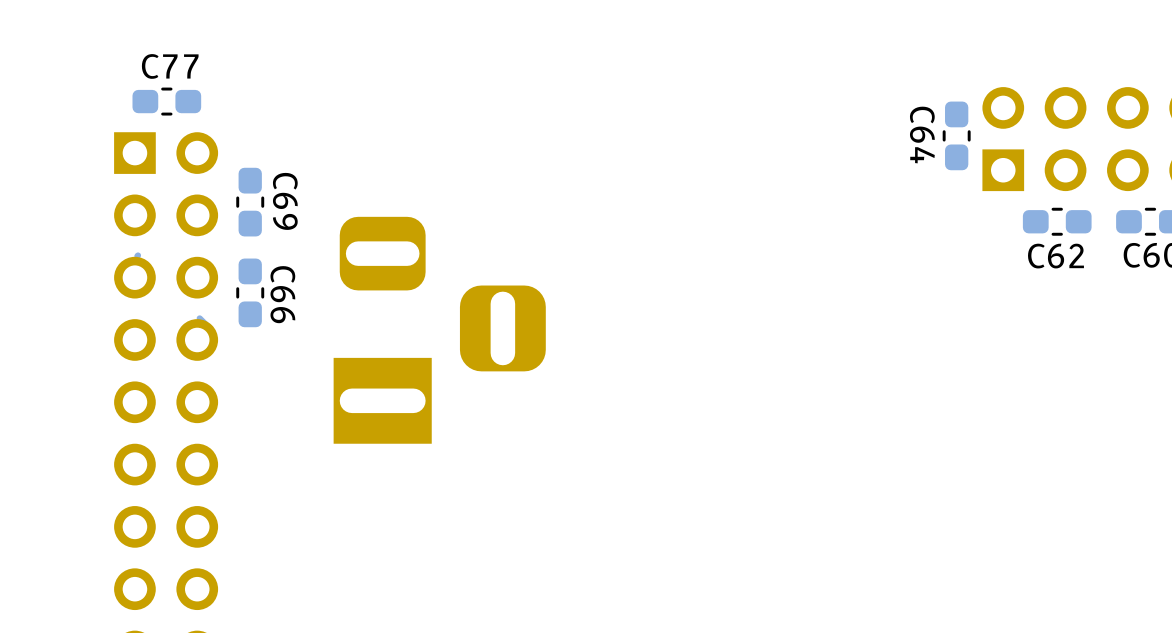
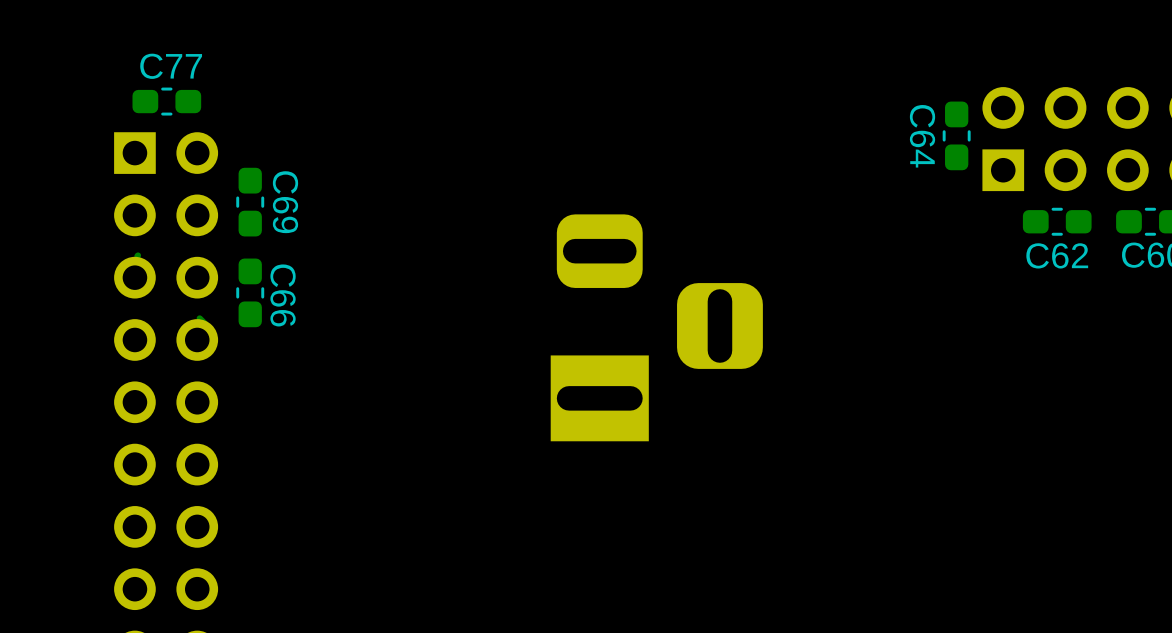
part position: (439, 330) -> (656, 327)

